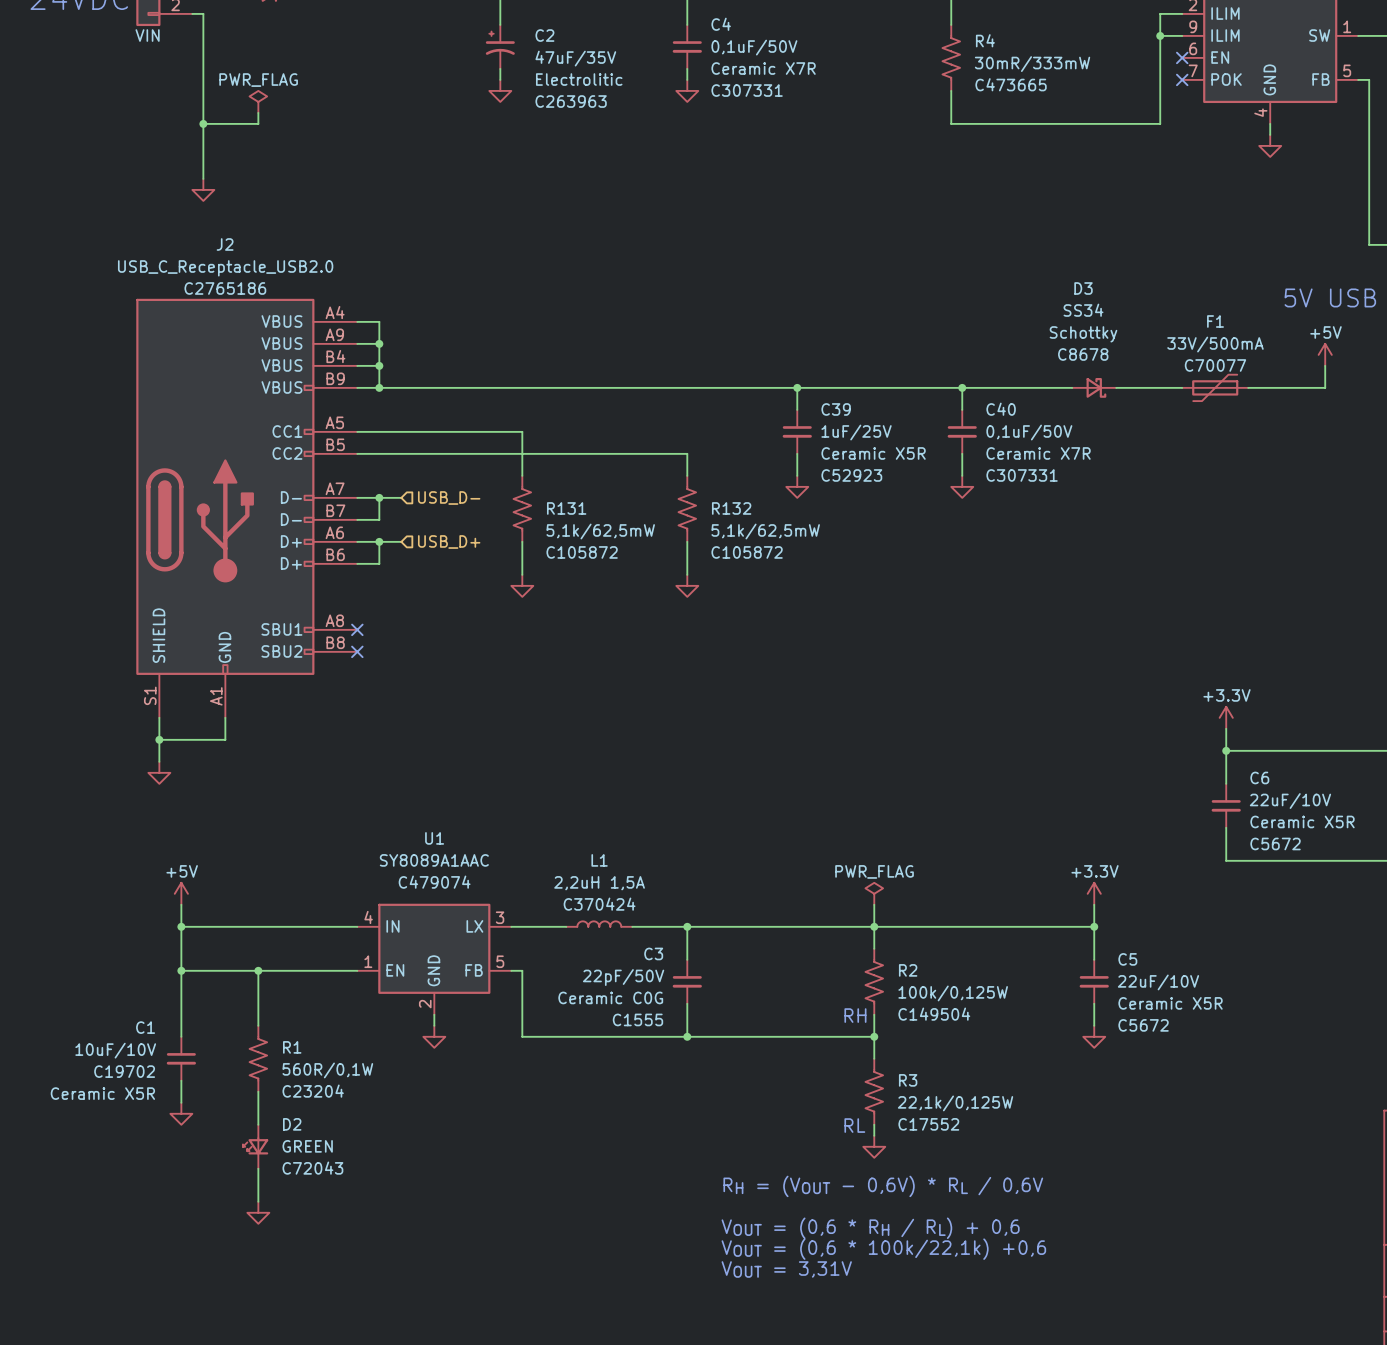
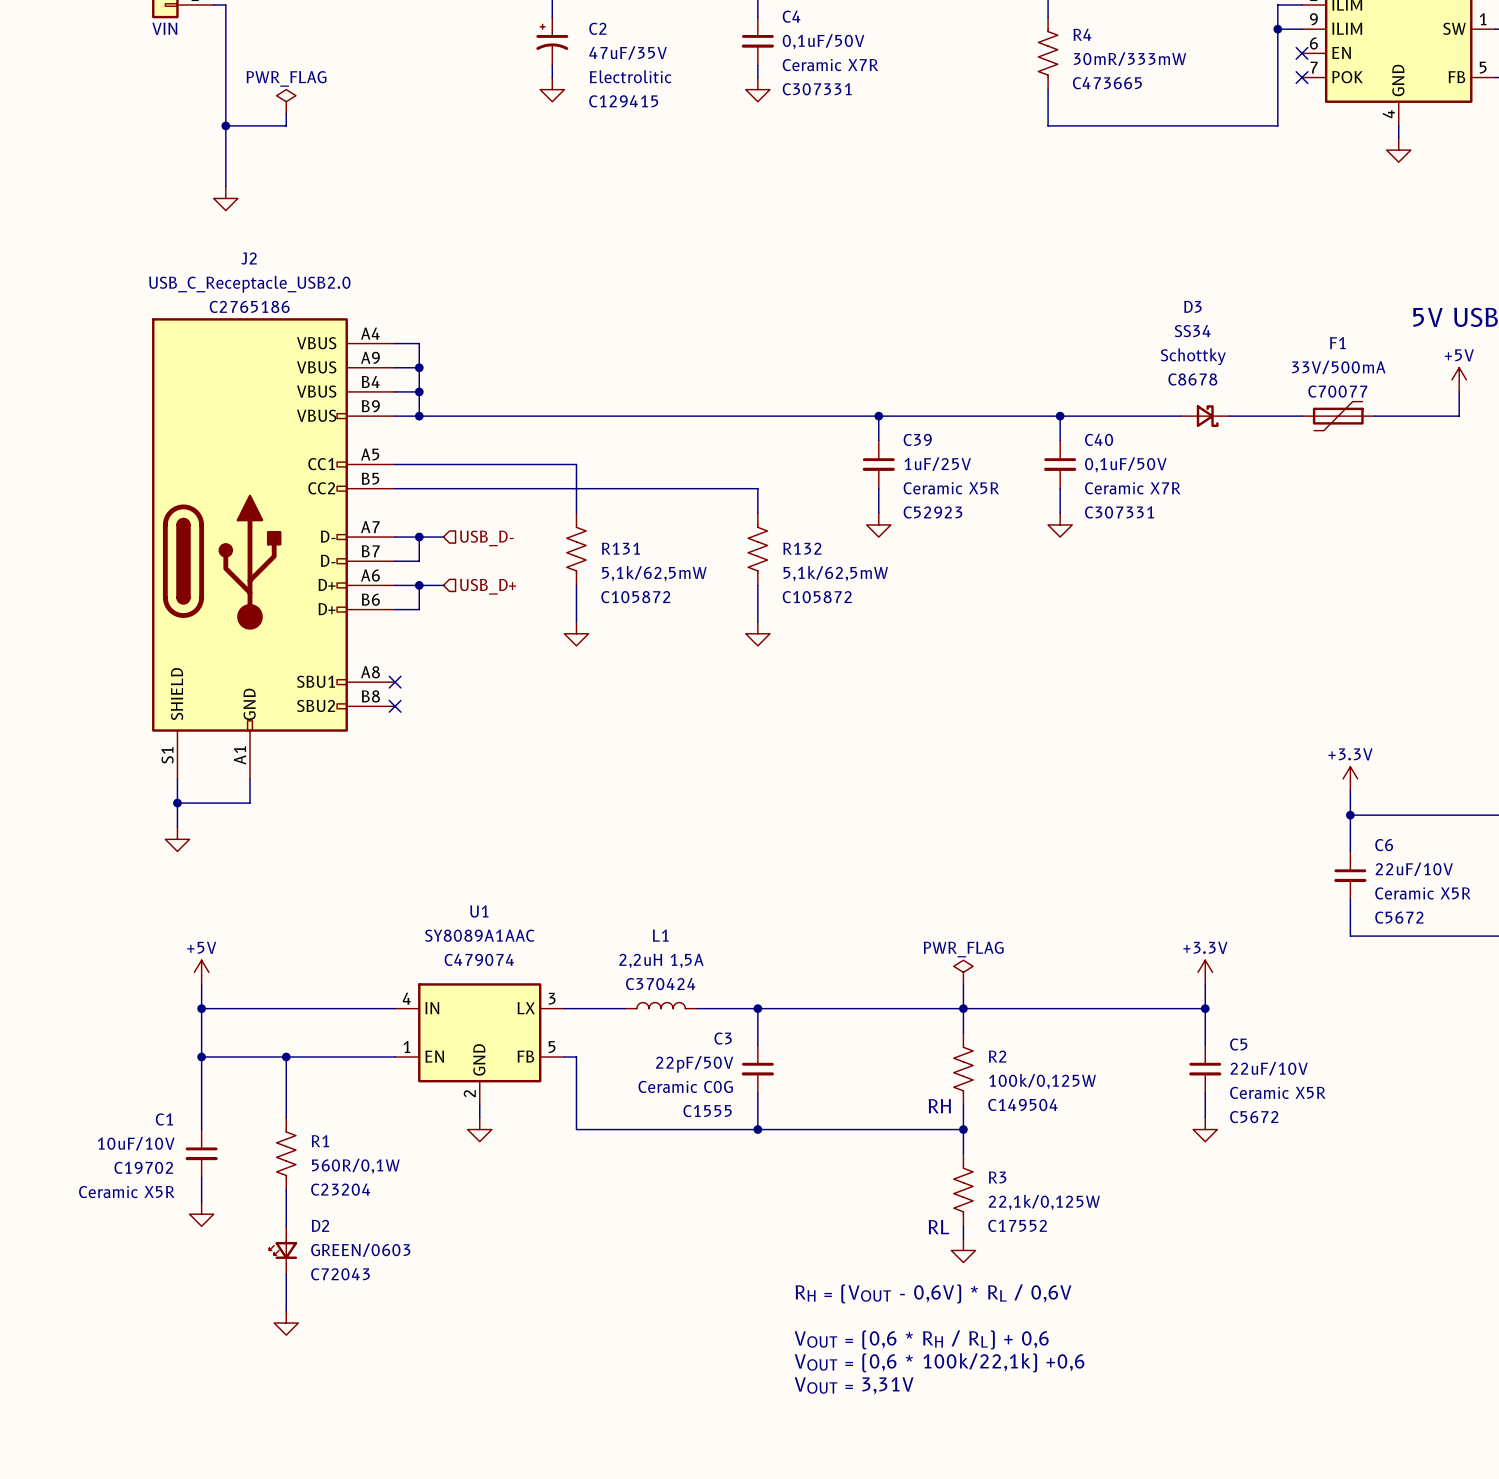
C2 text: C263963 (571, 101) -> C129415 (623, 101)
D2 value: GREEN (307, 1146) -> GREEN/0603 (360, 1250)

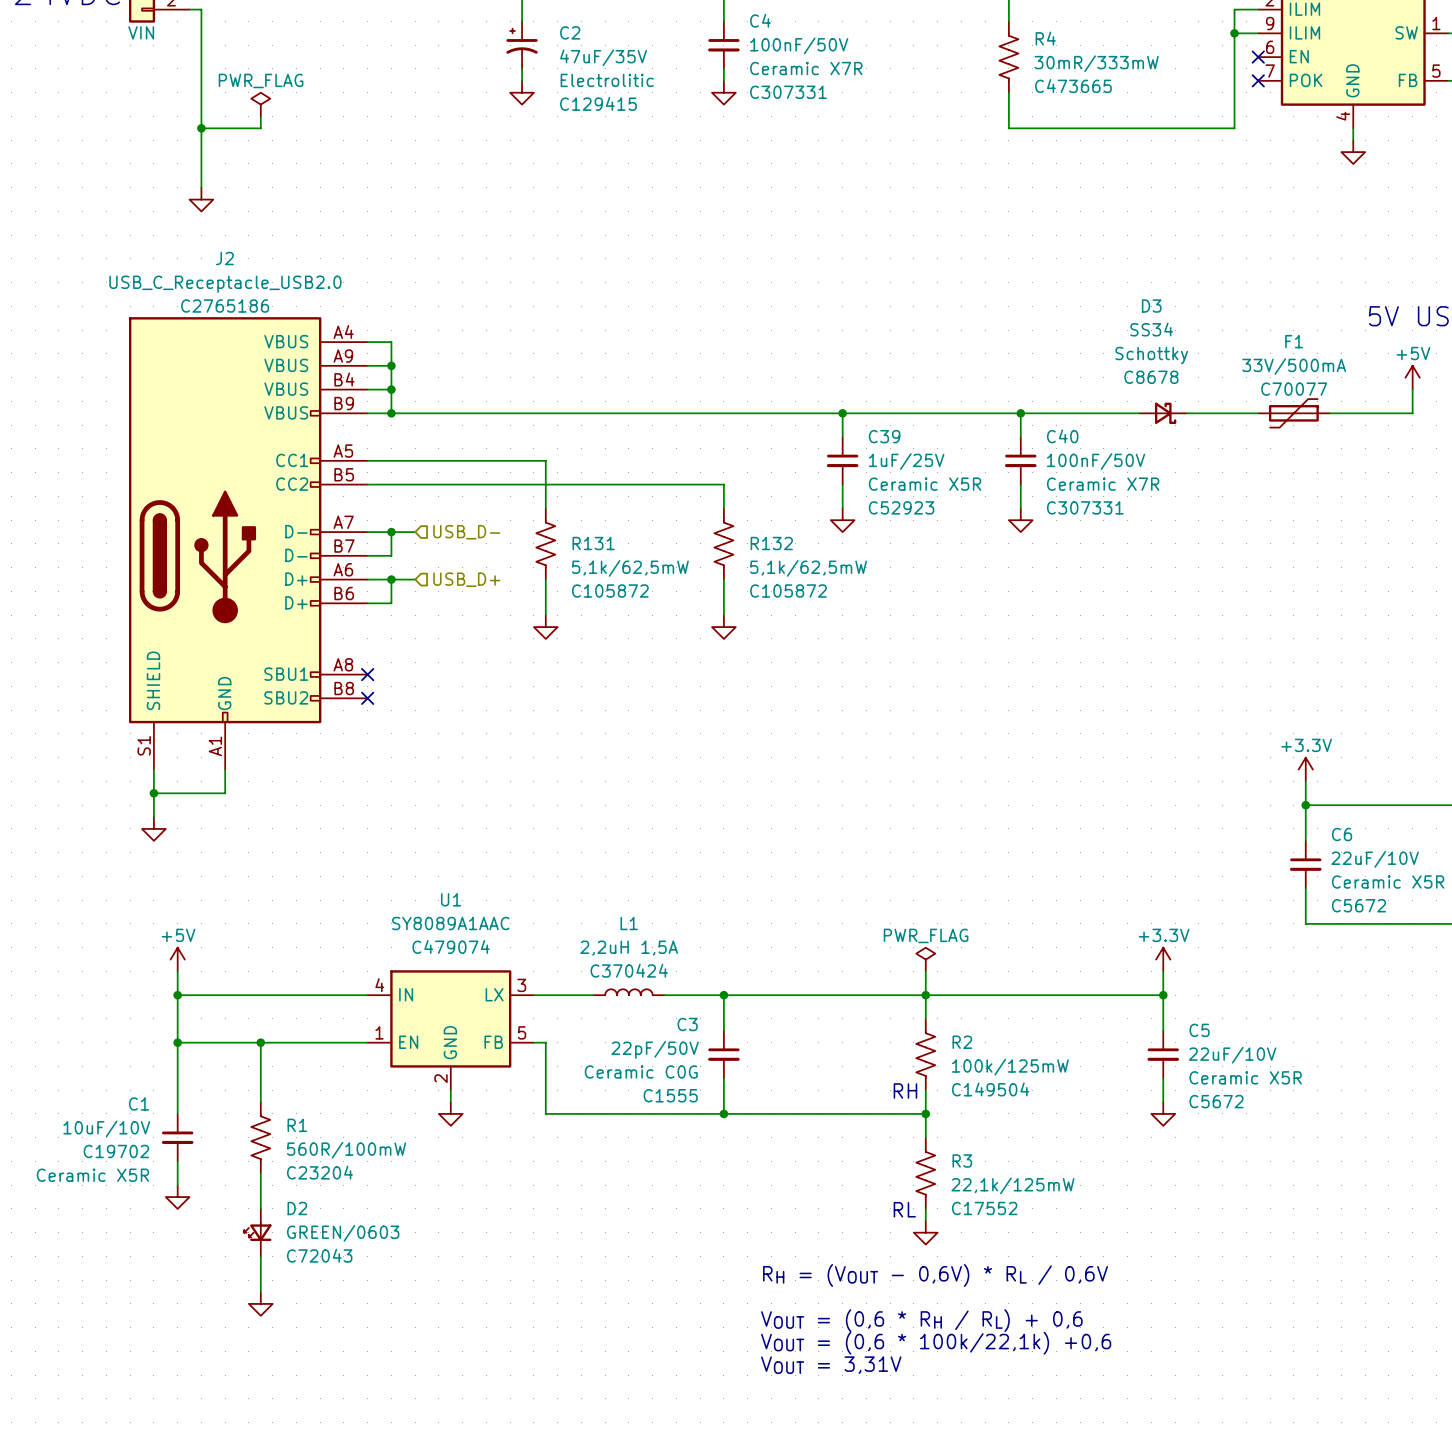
C4 value: 0,1uF/50V (823, 41) -> 100nF/50V (799, 45)
C40 value: 0,1uF/50V (1125, 464) -> 100nF/50V (1096, 461)
R2 value: 100k/0,125W (1042, 1081) -> 100k/125mW (1010, 1067)
R1 value: 560R/0,1W (355, 1166) -> 560R/100mW (346, 1150)
R3 value: 22,1k/0,125W (1044, 1202) -> 22,1k/125mW (1012, 1185)

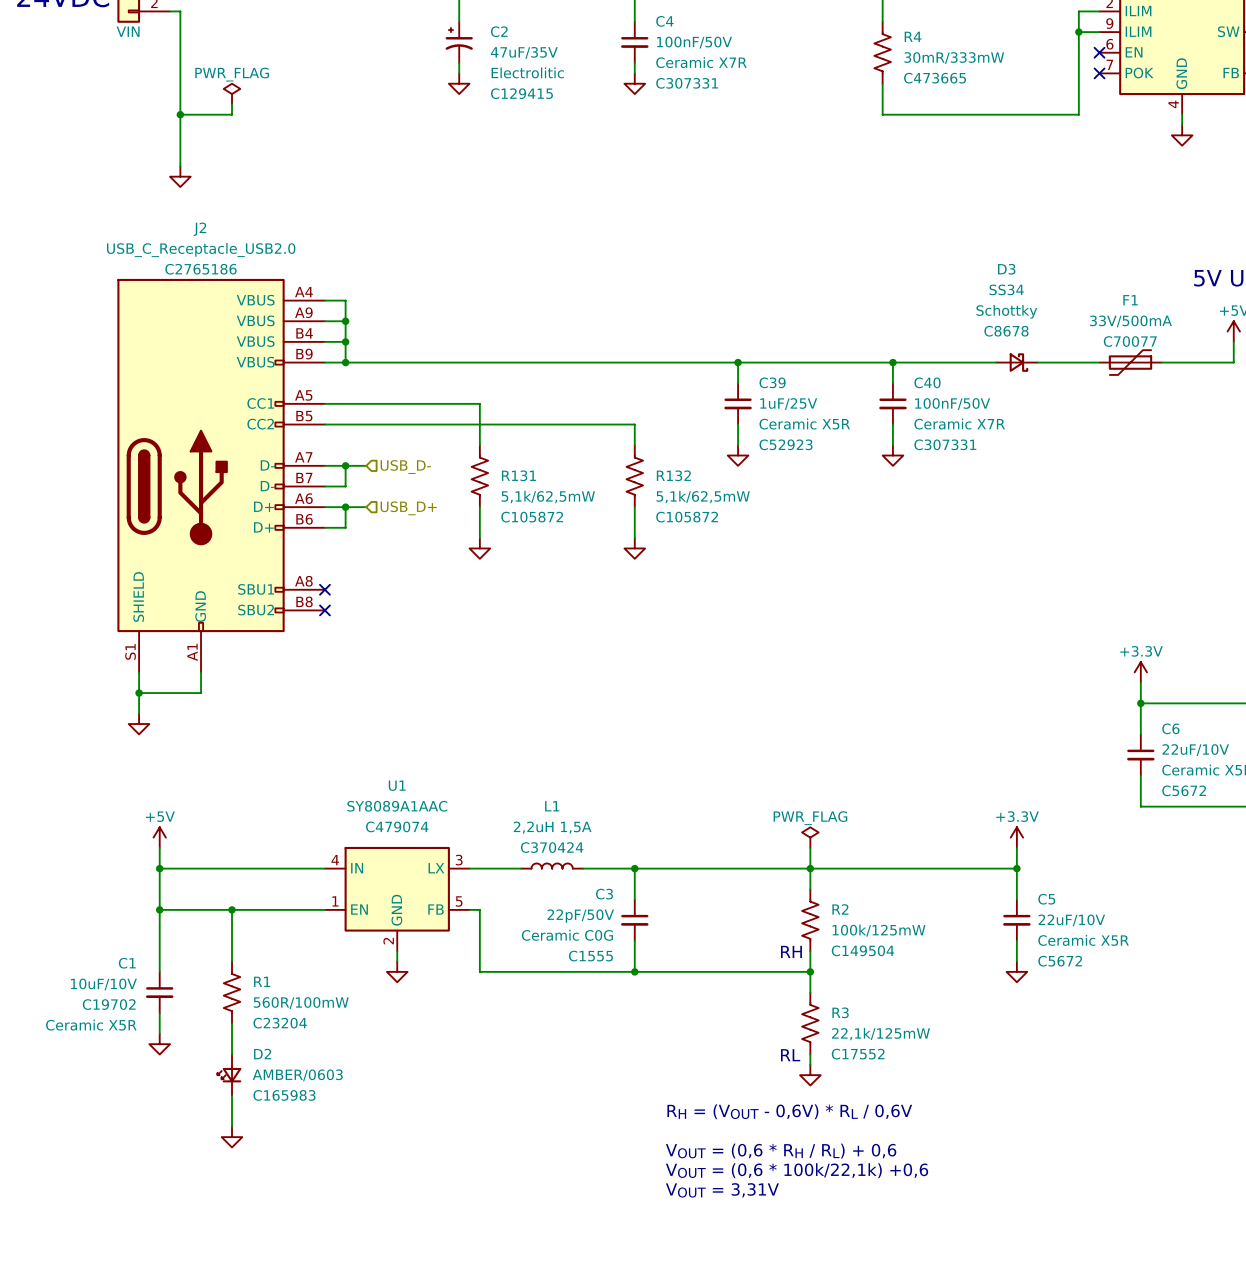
D2 value: GREEN/0603 (343, 1233) -> AMBER/0603 (297, 1075)
D2 text: C72043 (319, 1255) -> C165983 (284, 1095)

